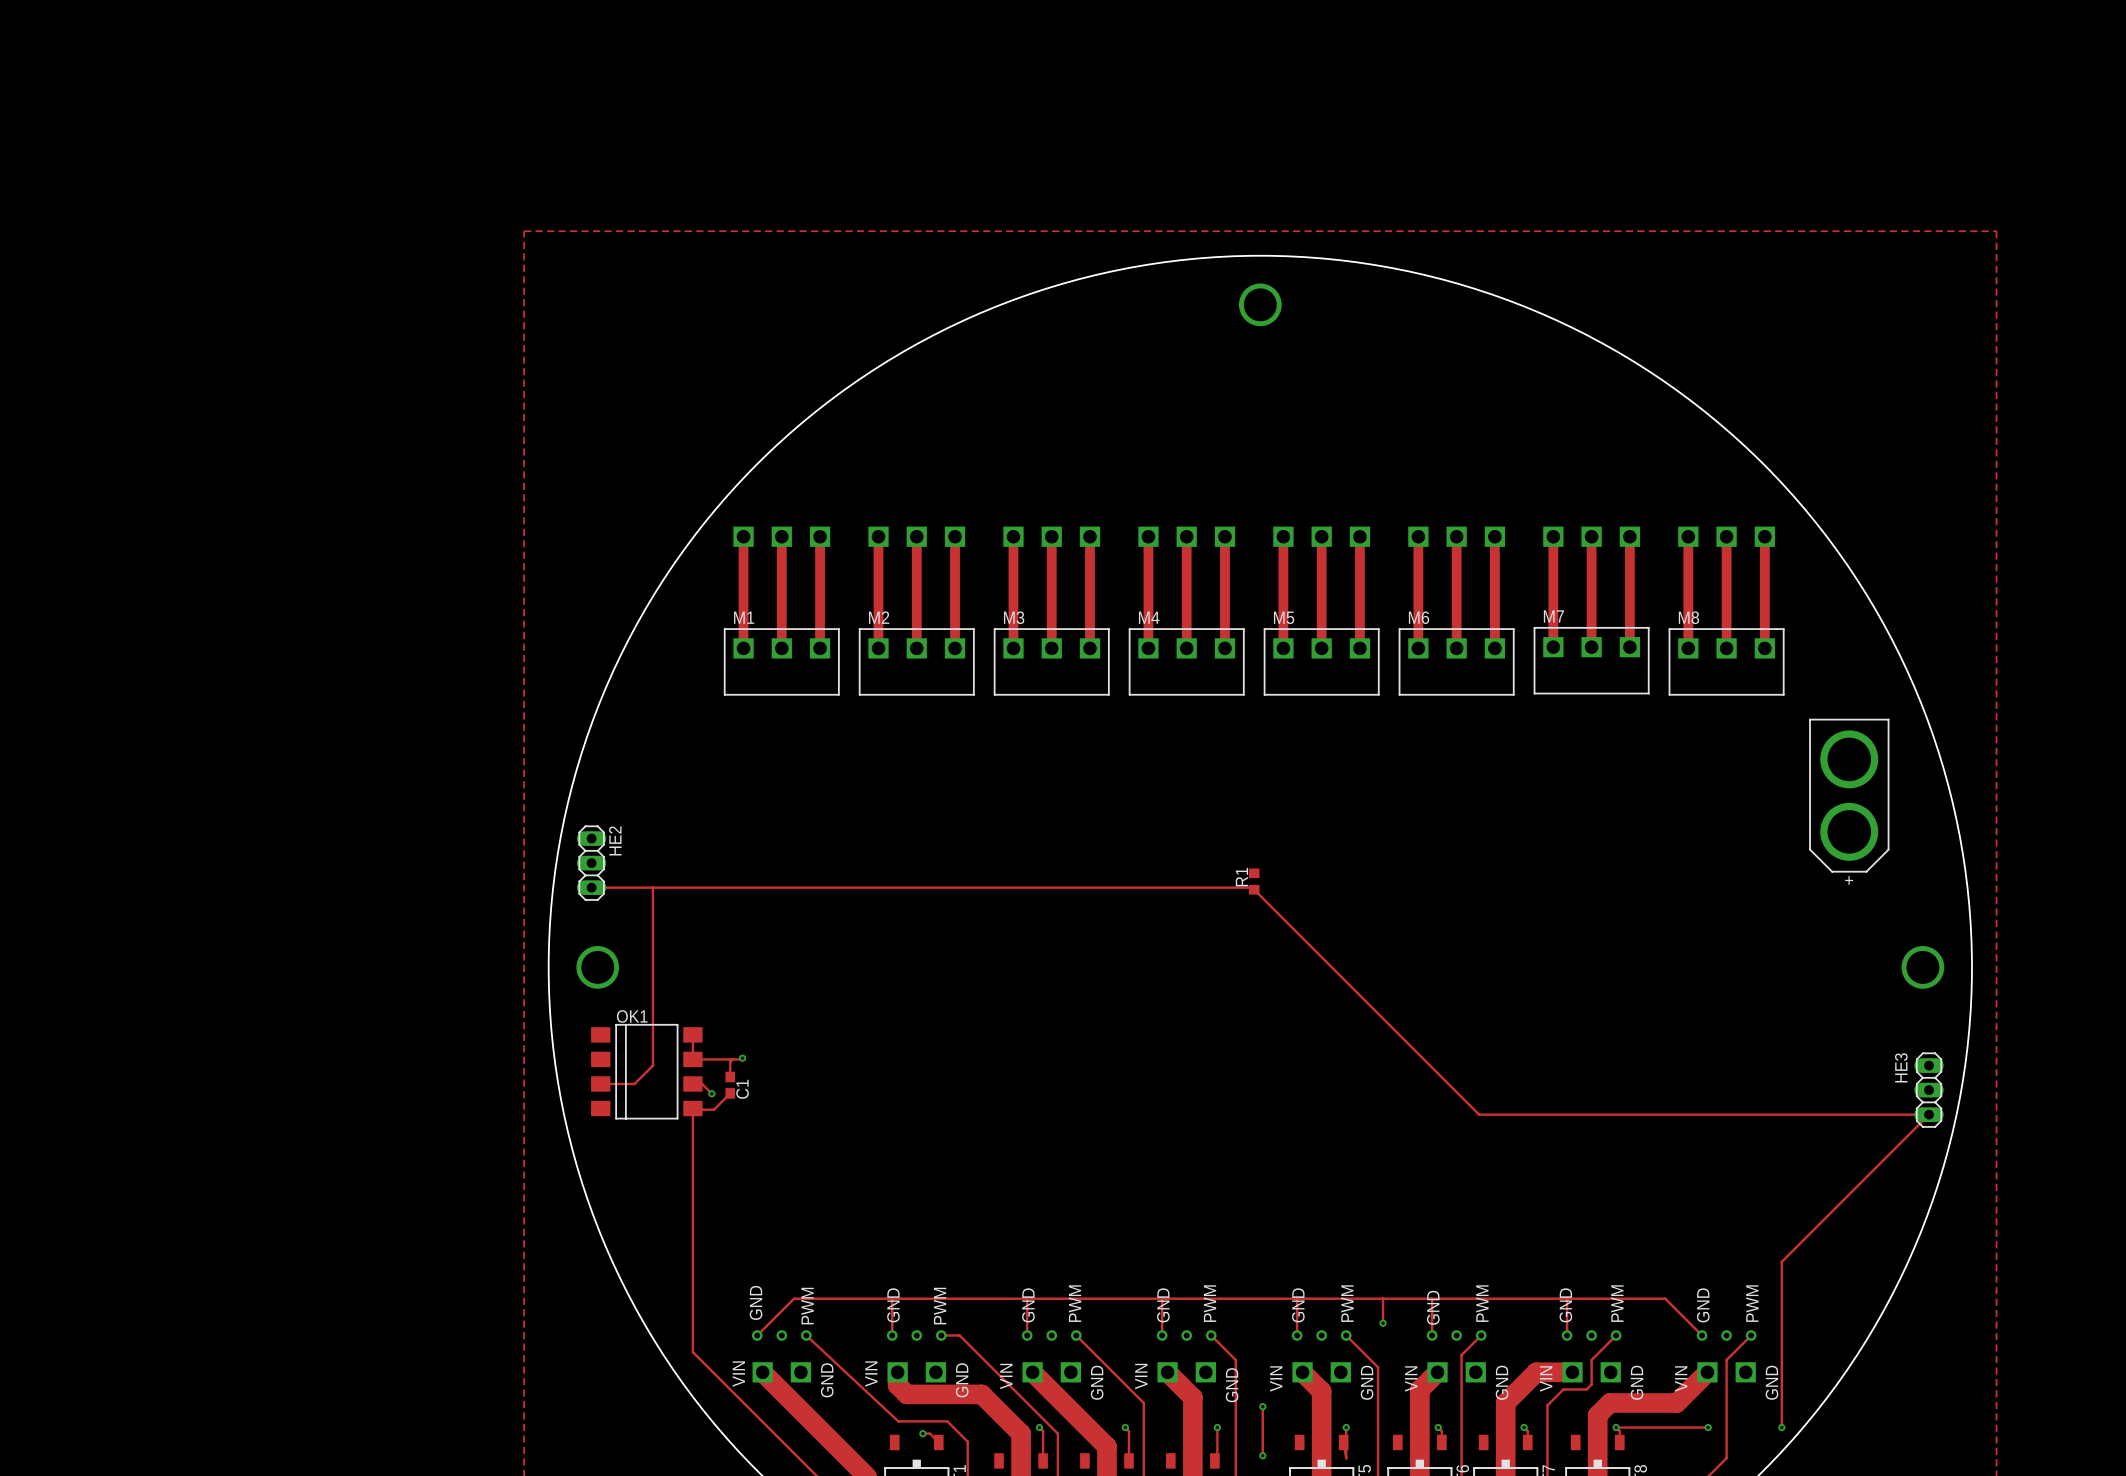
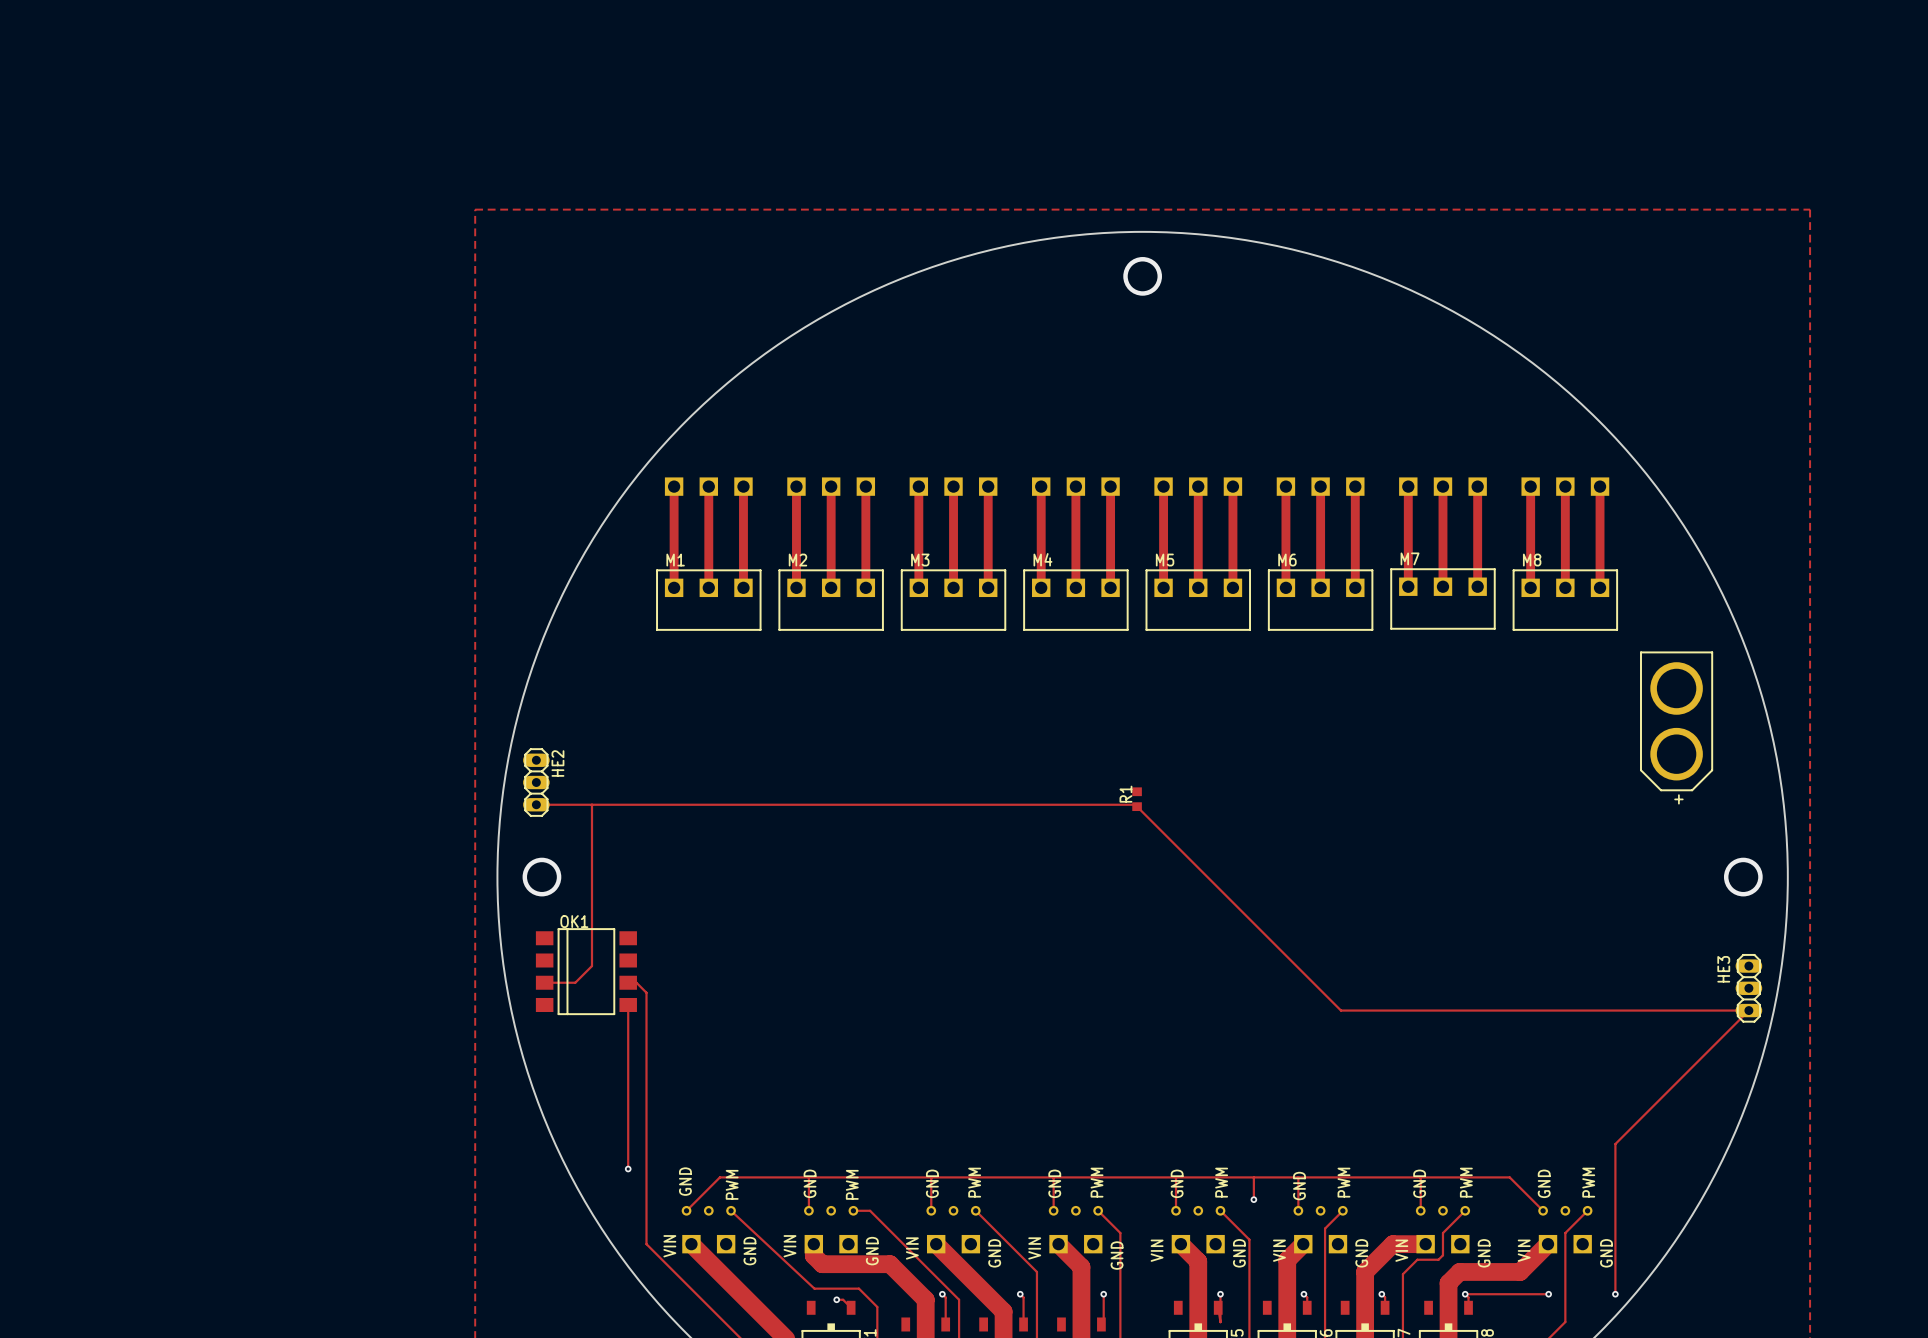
track: (692, 1034) (692, 1059) (742, 1058) -> none
via: (742, 1058) -> none
track: (732, 1059) (730, 1061) (730, 1076) -> none
C1: (730, 1085) -> none
via: (711, 1093) -> none
track: (730, 1093) (713, 1109) (692, 1109) -> none
track: (692, 1289) (692, 1352) (713, 1372) -> (646, 992) (646, 1244)
via: none -> (628, 1169)
track: (1262, 1406) (1262, 1455) -> none
via: (1262, 1406) -> none
via: (1262, 1455) -> none

